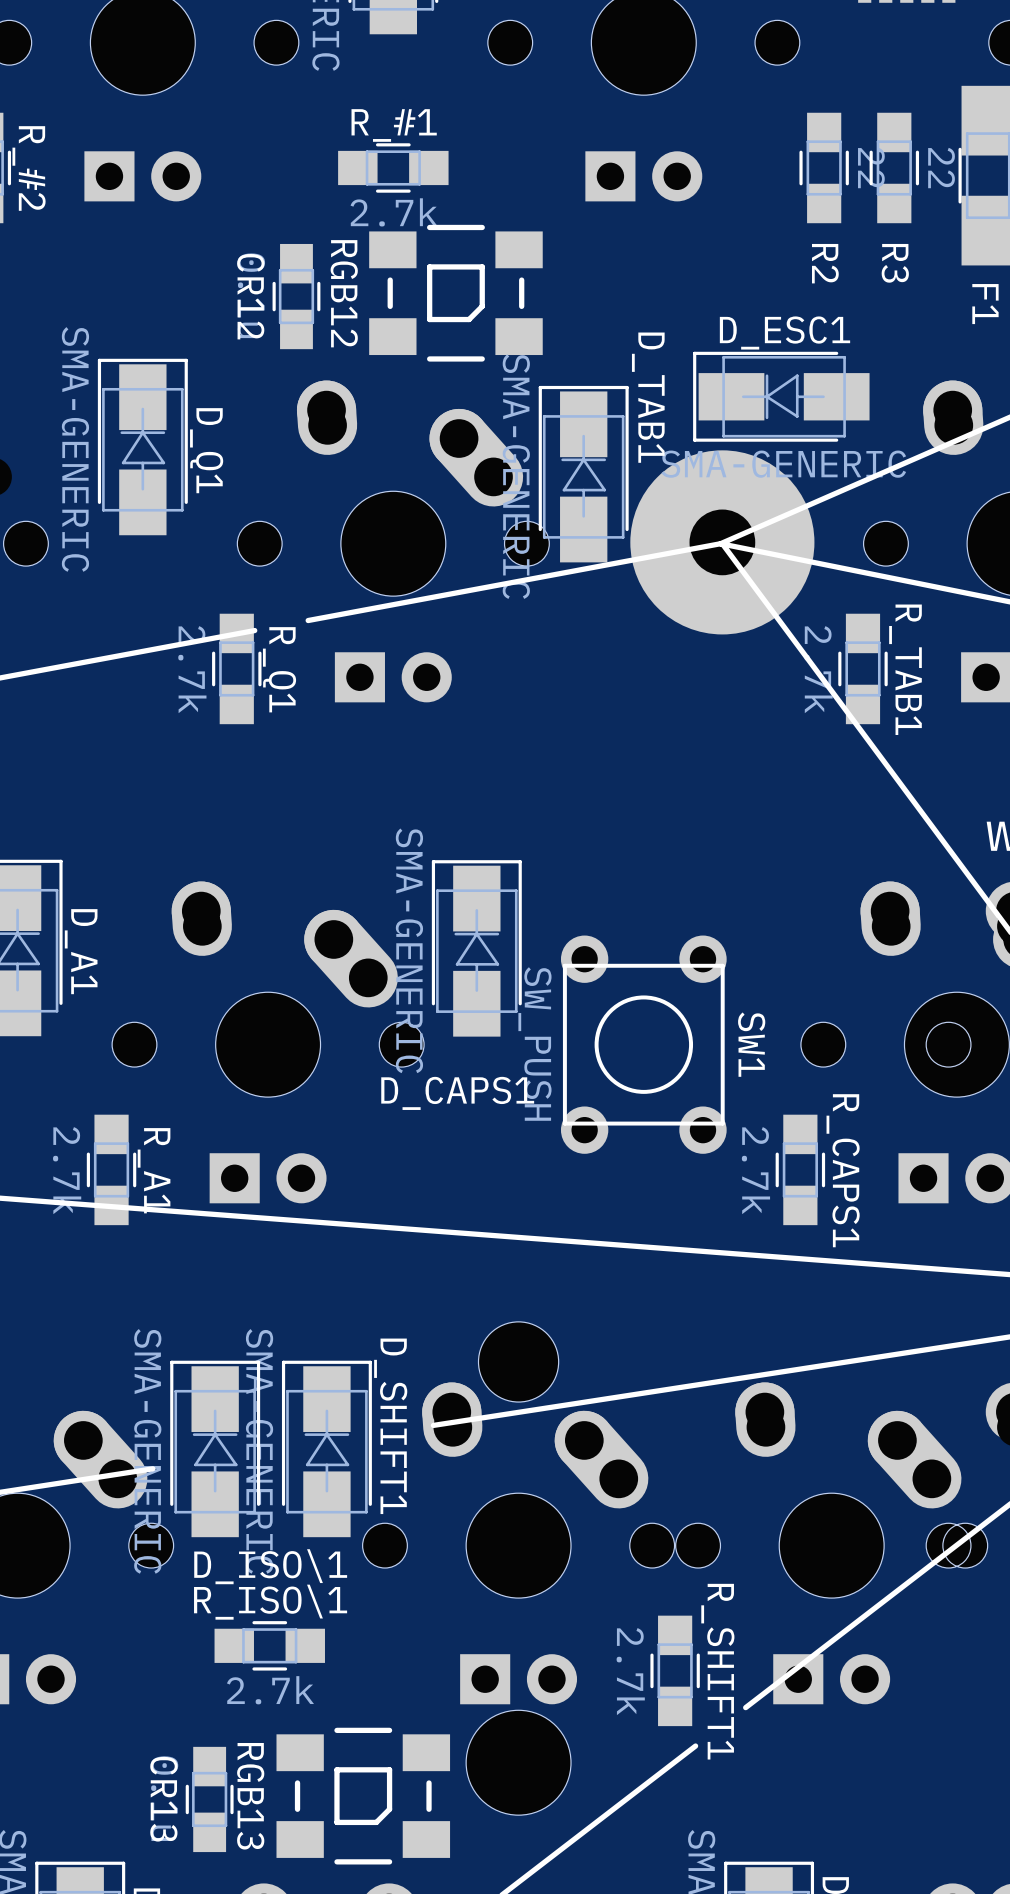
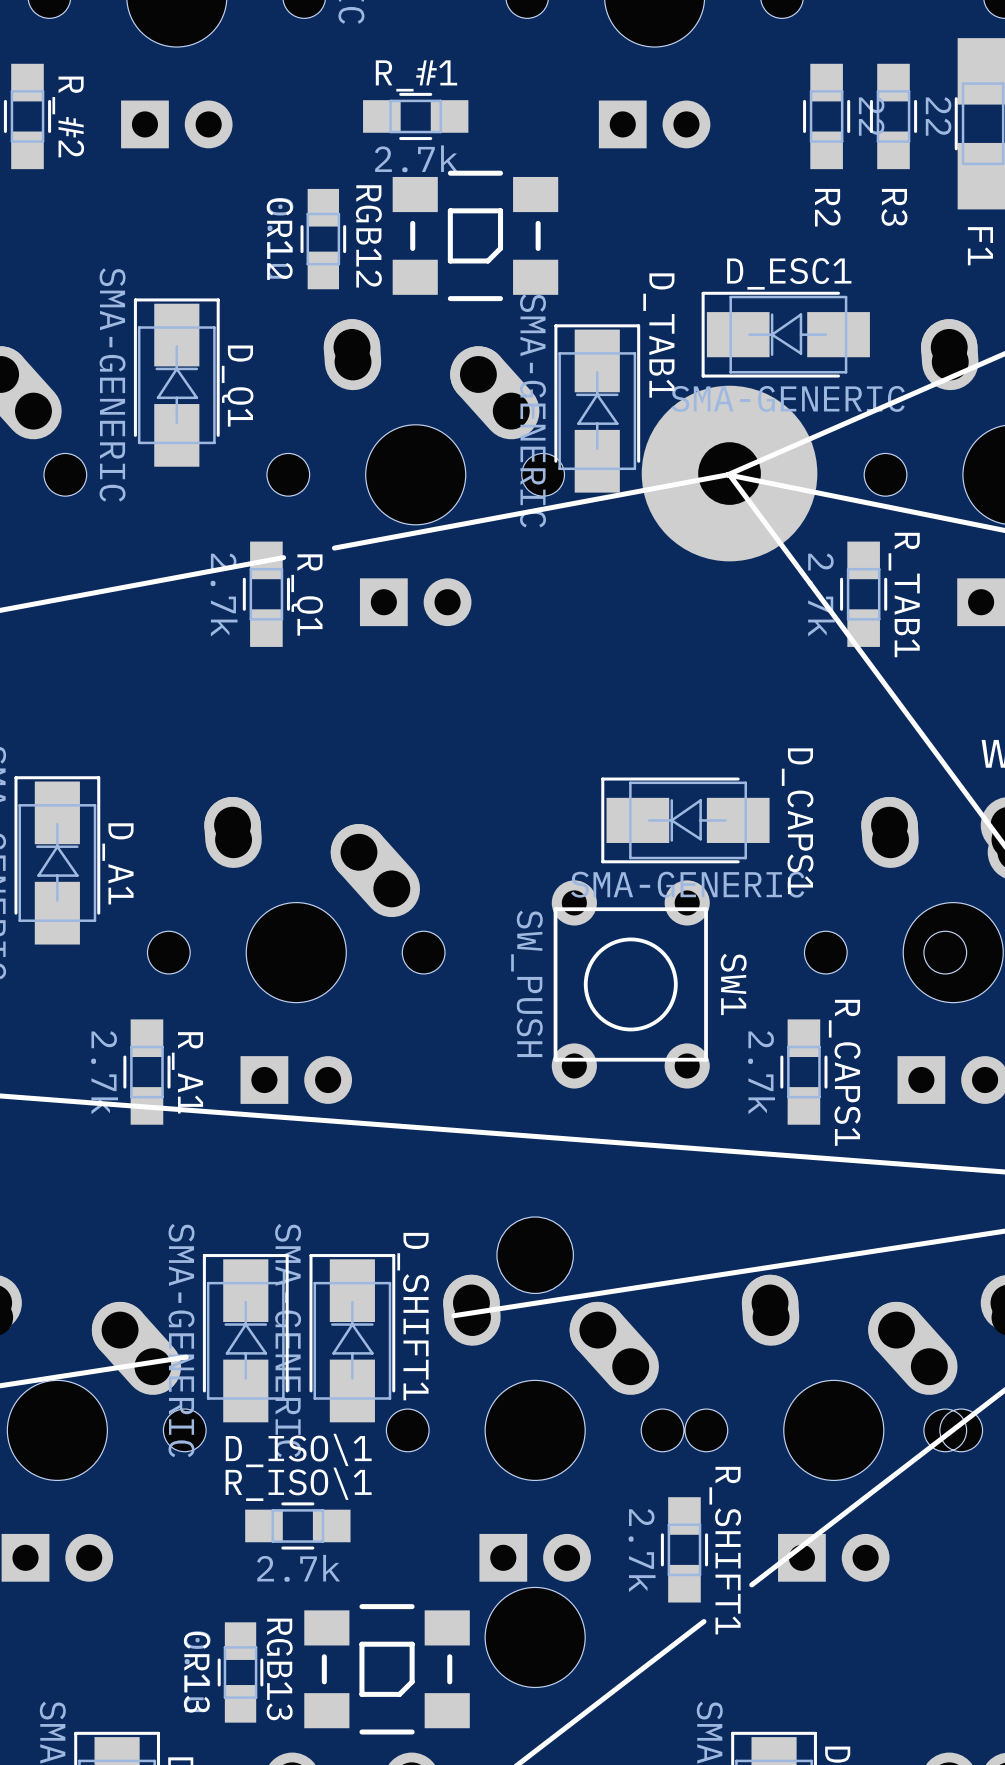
D_CAPS1 rotation: 0° (476, 948) -> 90° counterclockwise (685, 820)
D_CAPS1 position: (476, 948) -> (685, 820)
SW1 position: (643, 1044) -> (630, 984)

